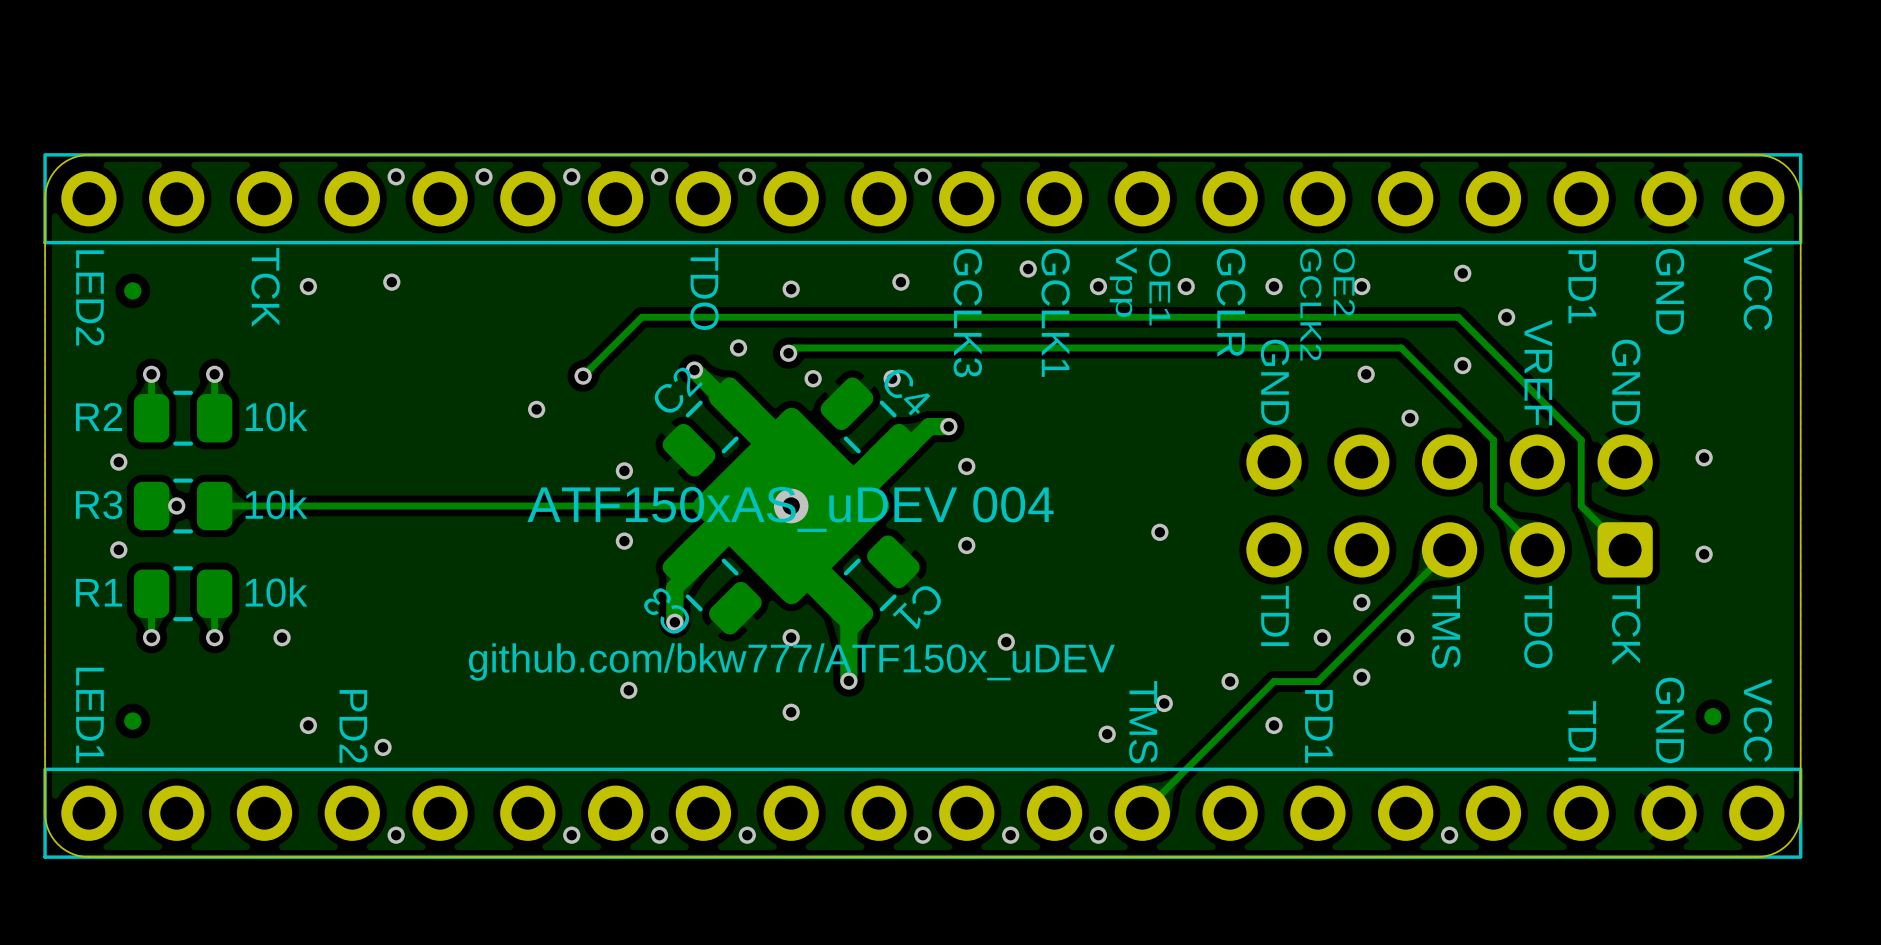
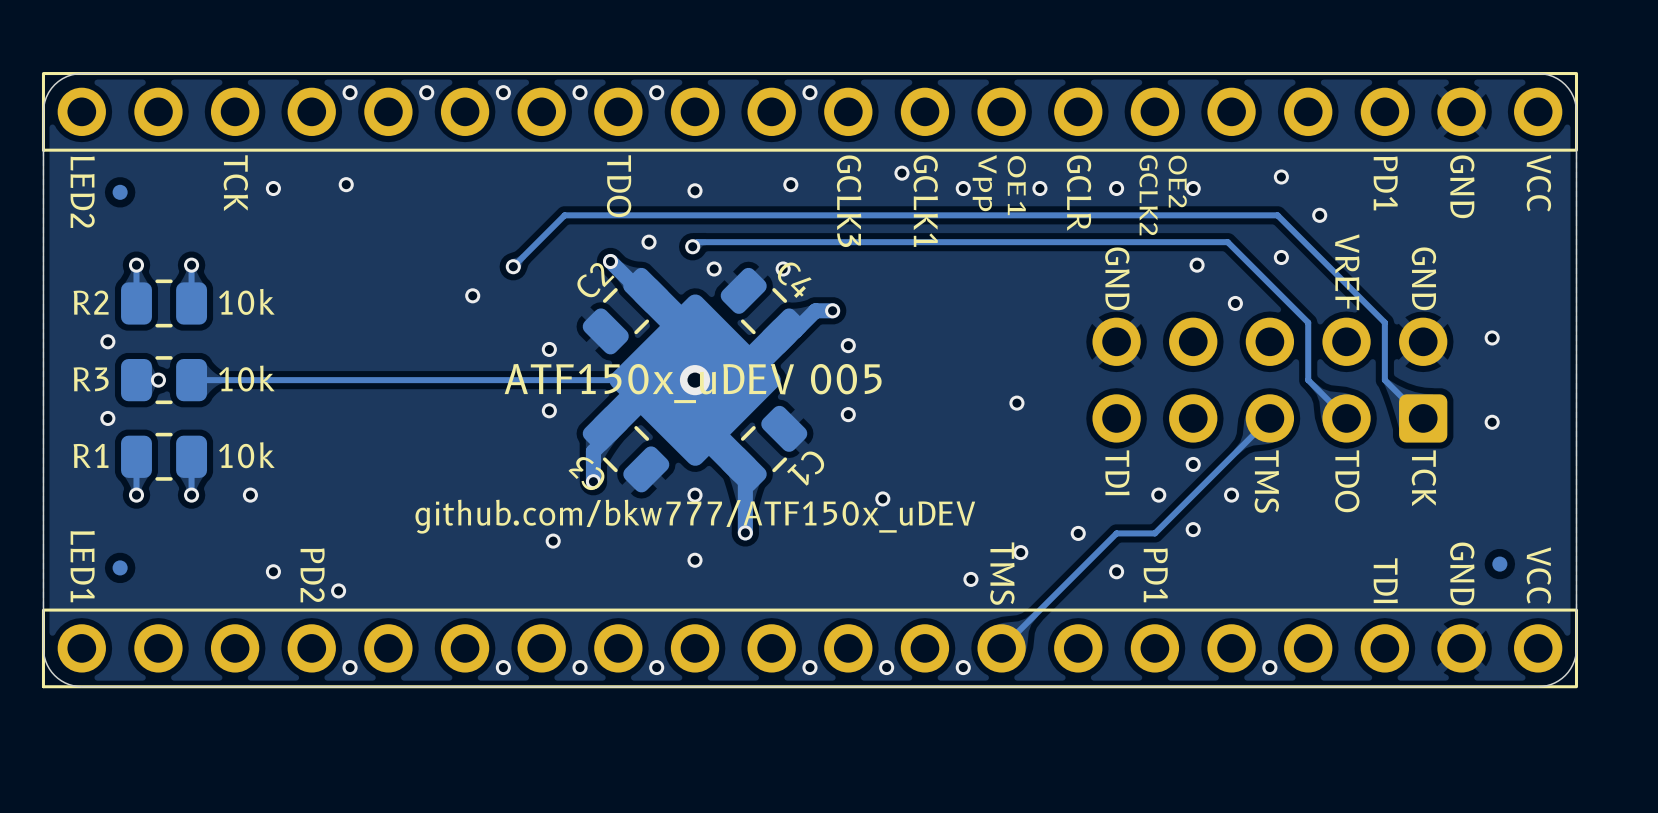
text: ATF150xAS_uDEV 004 (790, 509) -> ATF150x_uDEV 005 (693, 383)

